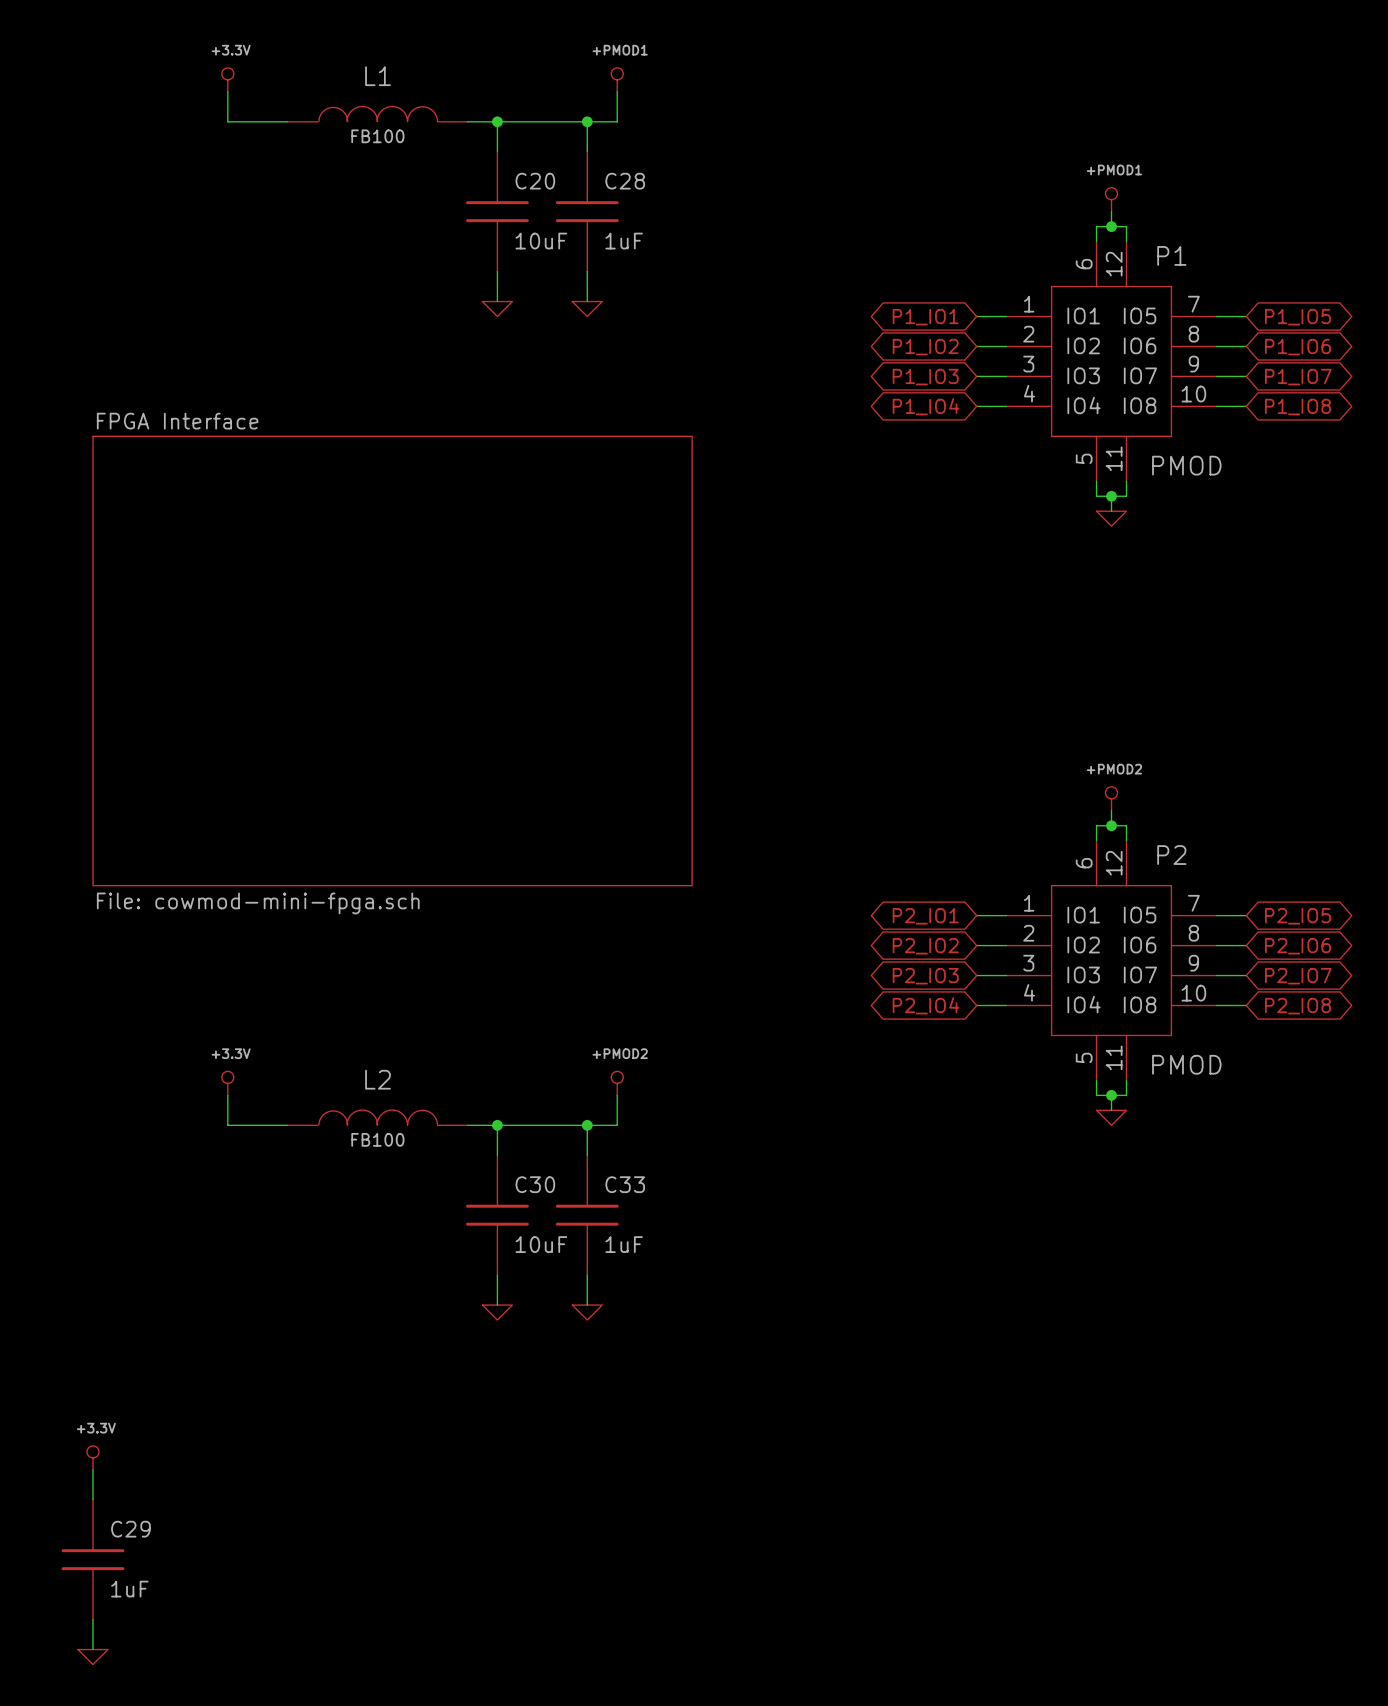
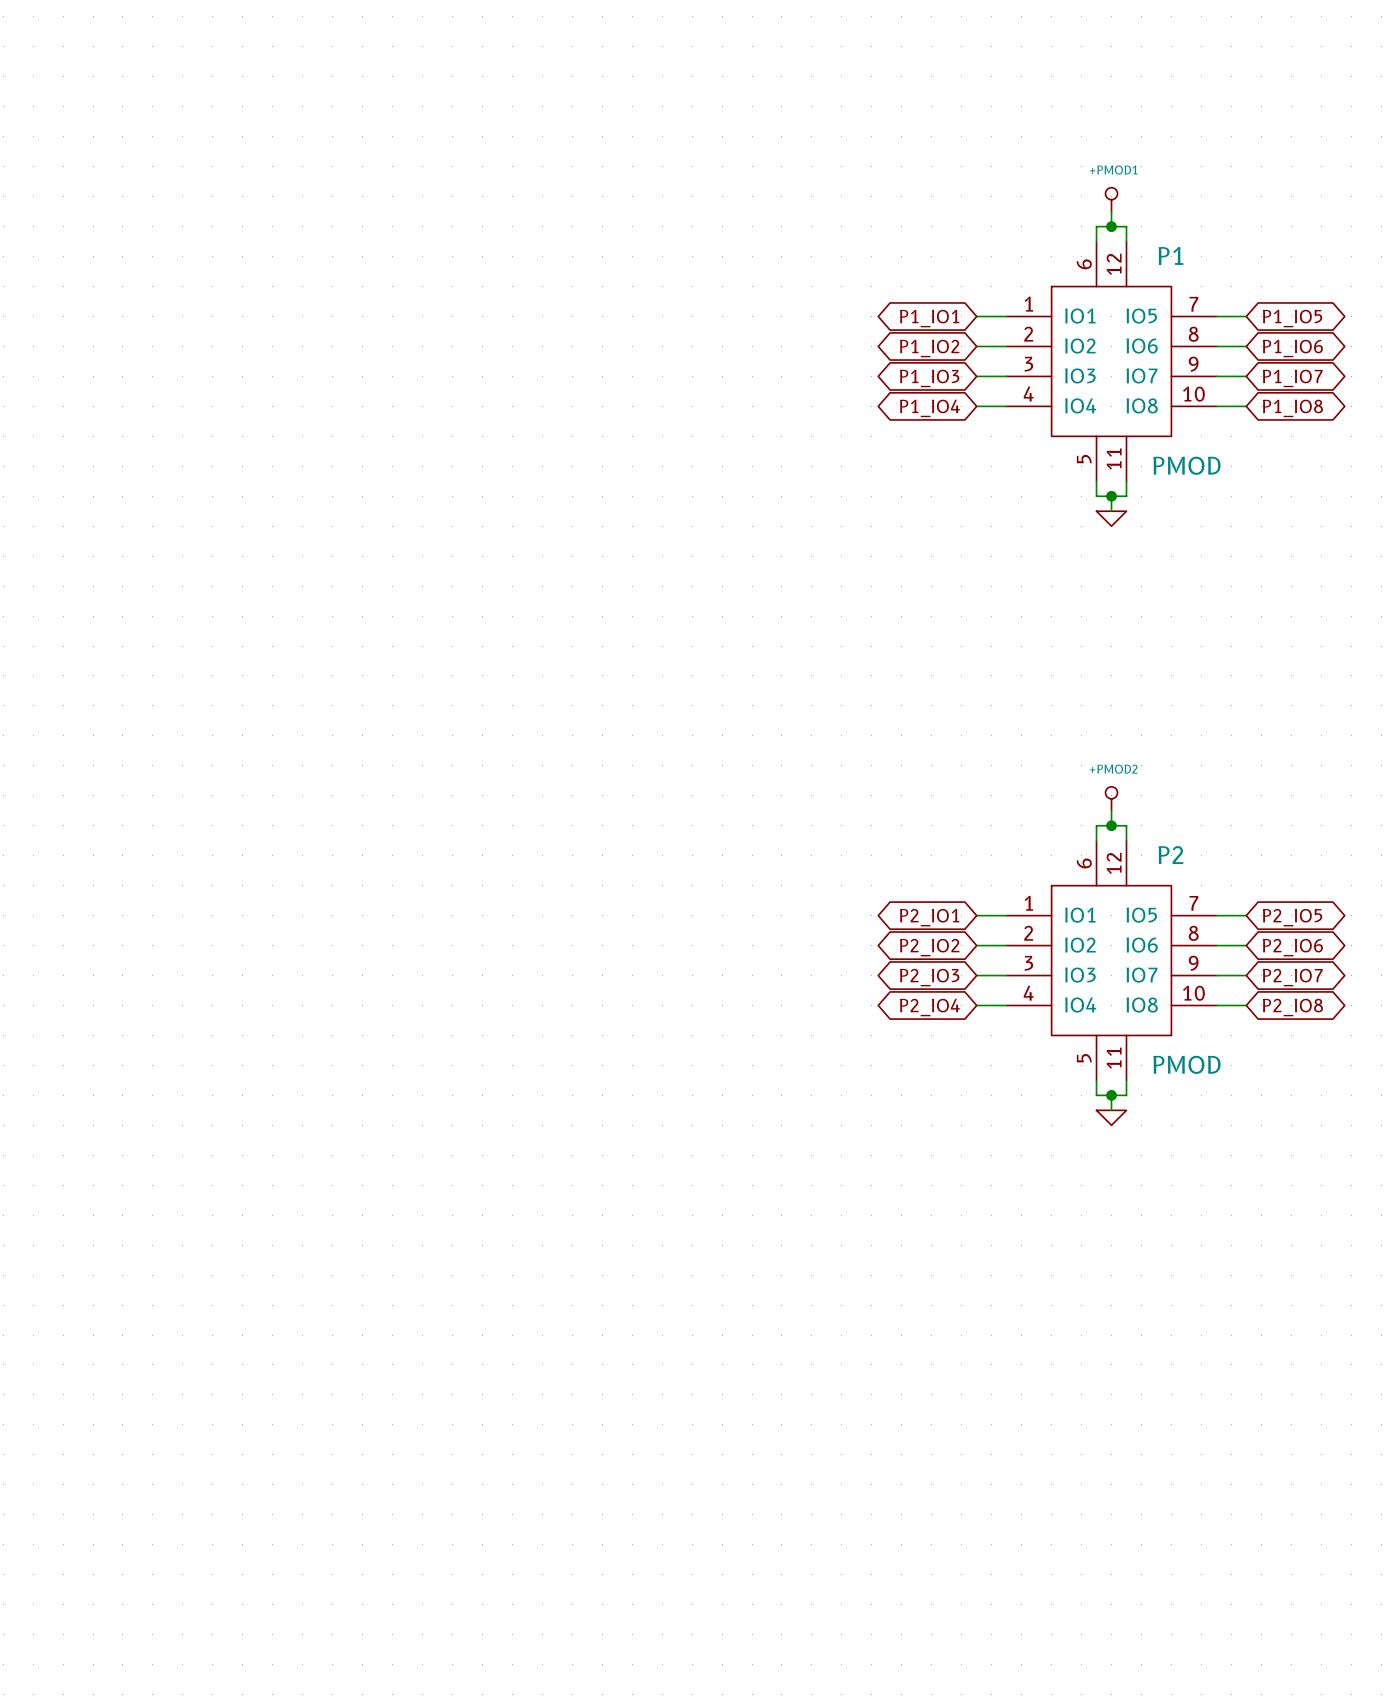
power symbol: +3.3V (227, 79) -> none
power symbol: +PMOD1 (617, 79) -> none
wire: (227, 91) (227, 121) (287, 121) -> none
wire: (617, 91) (617, 121) (467, 121) -> none
L1: FB100 (377, 114) -> none
wire: (497, 121) (497, 151) -> none
junction: (497, 121) -> none
wire: (587, 121) (587, 151) -> none
junction: (587, 121) -> none
C20: 10uF (497, 211) -> none
C28: 1uF (587, 211) -> none
wire: (497, 271) (497, 301) -> none
wire: (587, 271) (587, 301) -> none
power symbol: (497, 309) -> none
power symbol: (587, 309) -> none
sheet FPGA Interface: File: cowmod-mini-fpga.sch (392, 661) -> none
power symbol: +3.3V (227, 1083) -> none
power symbol: +PMOD2 (617, 1083) -> none
wire: (227, 1095) (227, 1125) (287, 1125) -> none
wire: (617, 1095) (617, 1125) (467, 1125) -> none
L2: FB100 (377, 1117) -> none
wire: (497, 1125) (497, 1155) -> none
junction: (497, 1125) -> none
wire: (587, 1125) (587, 1155) -> none
junction: (587, 1125) -> none
C30: 10uF (497, 1215) -> none
C33: 1uF (587, 1215) -> none
wire: (497, 1275) (497, 1305) -> none
wire: (587, 1275) (587, 1305) -> none
power symbol: (497, 1312) -> none
power symbol: (587, 1312) -> none
power symbol: +3.3V (93, 1457) -> none
wire: (93, 1469) (93, 1499) -> none
C29: 1uF (93, 1559) -> none
wire: (93, 1619) (93, 1649) -> none
power symbol: (93, 1657) -> none

